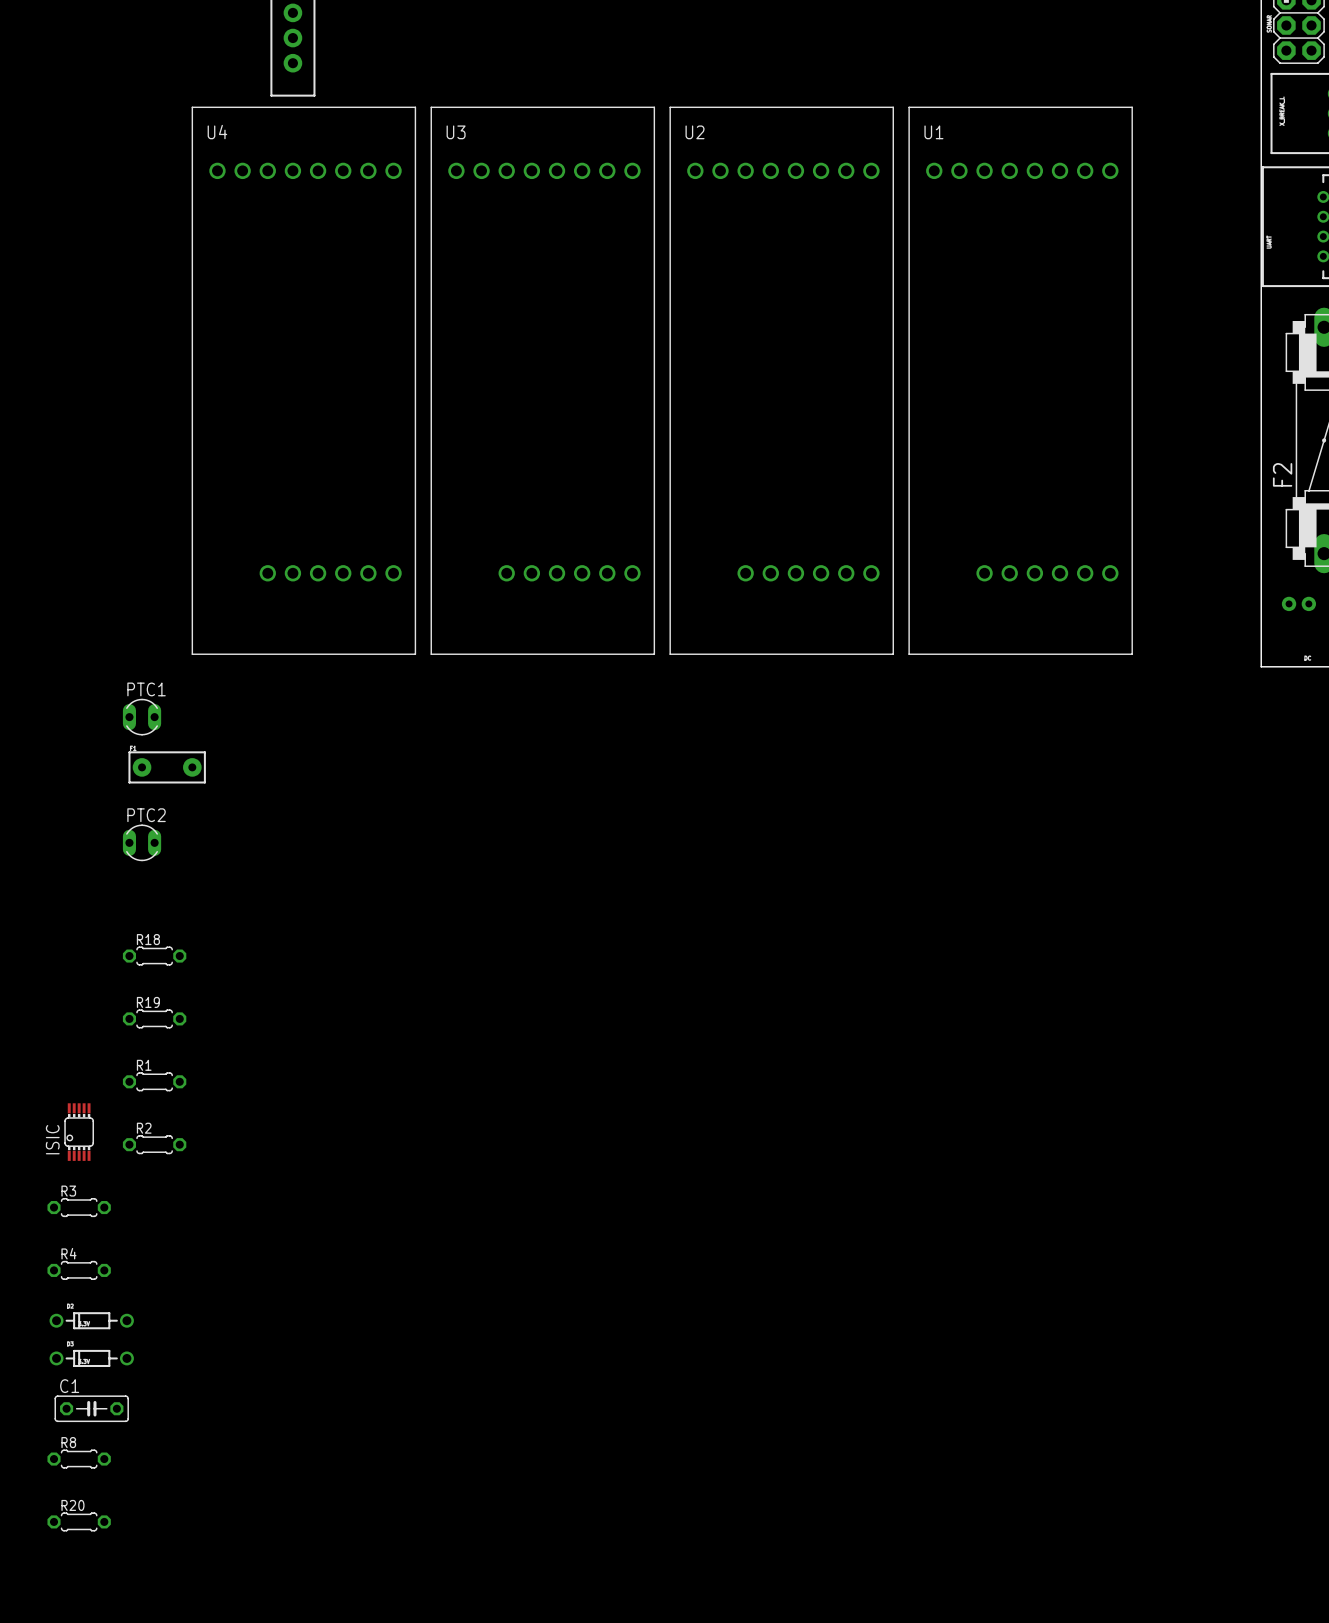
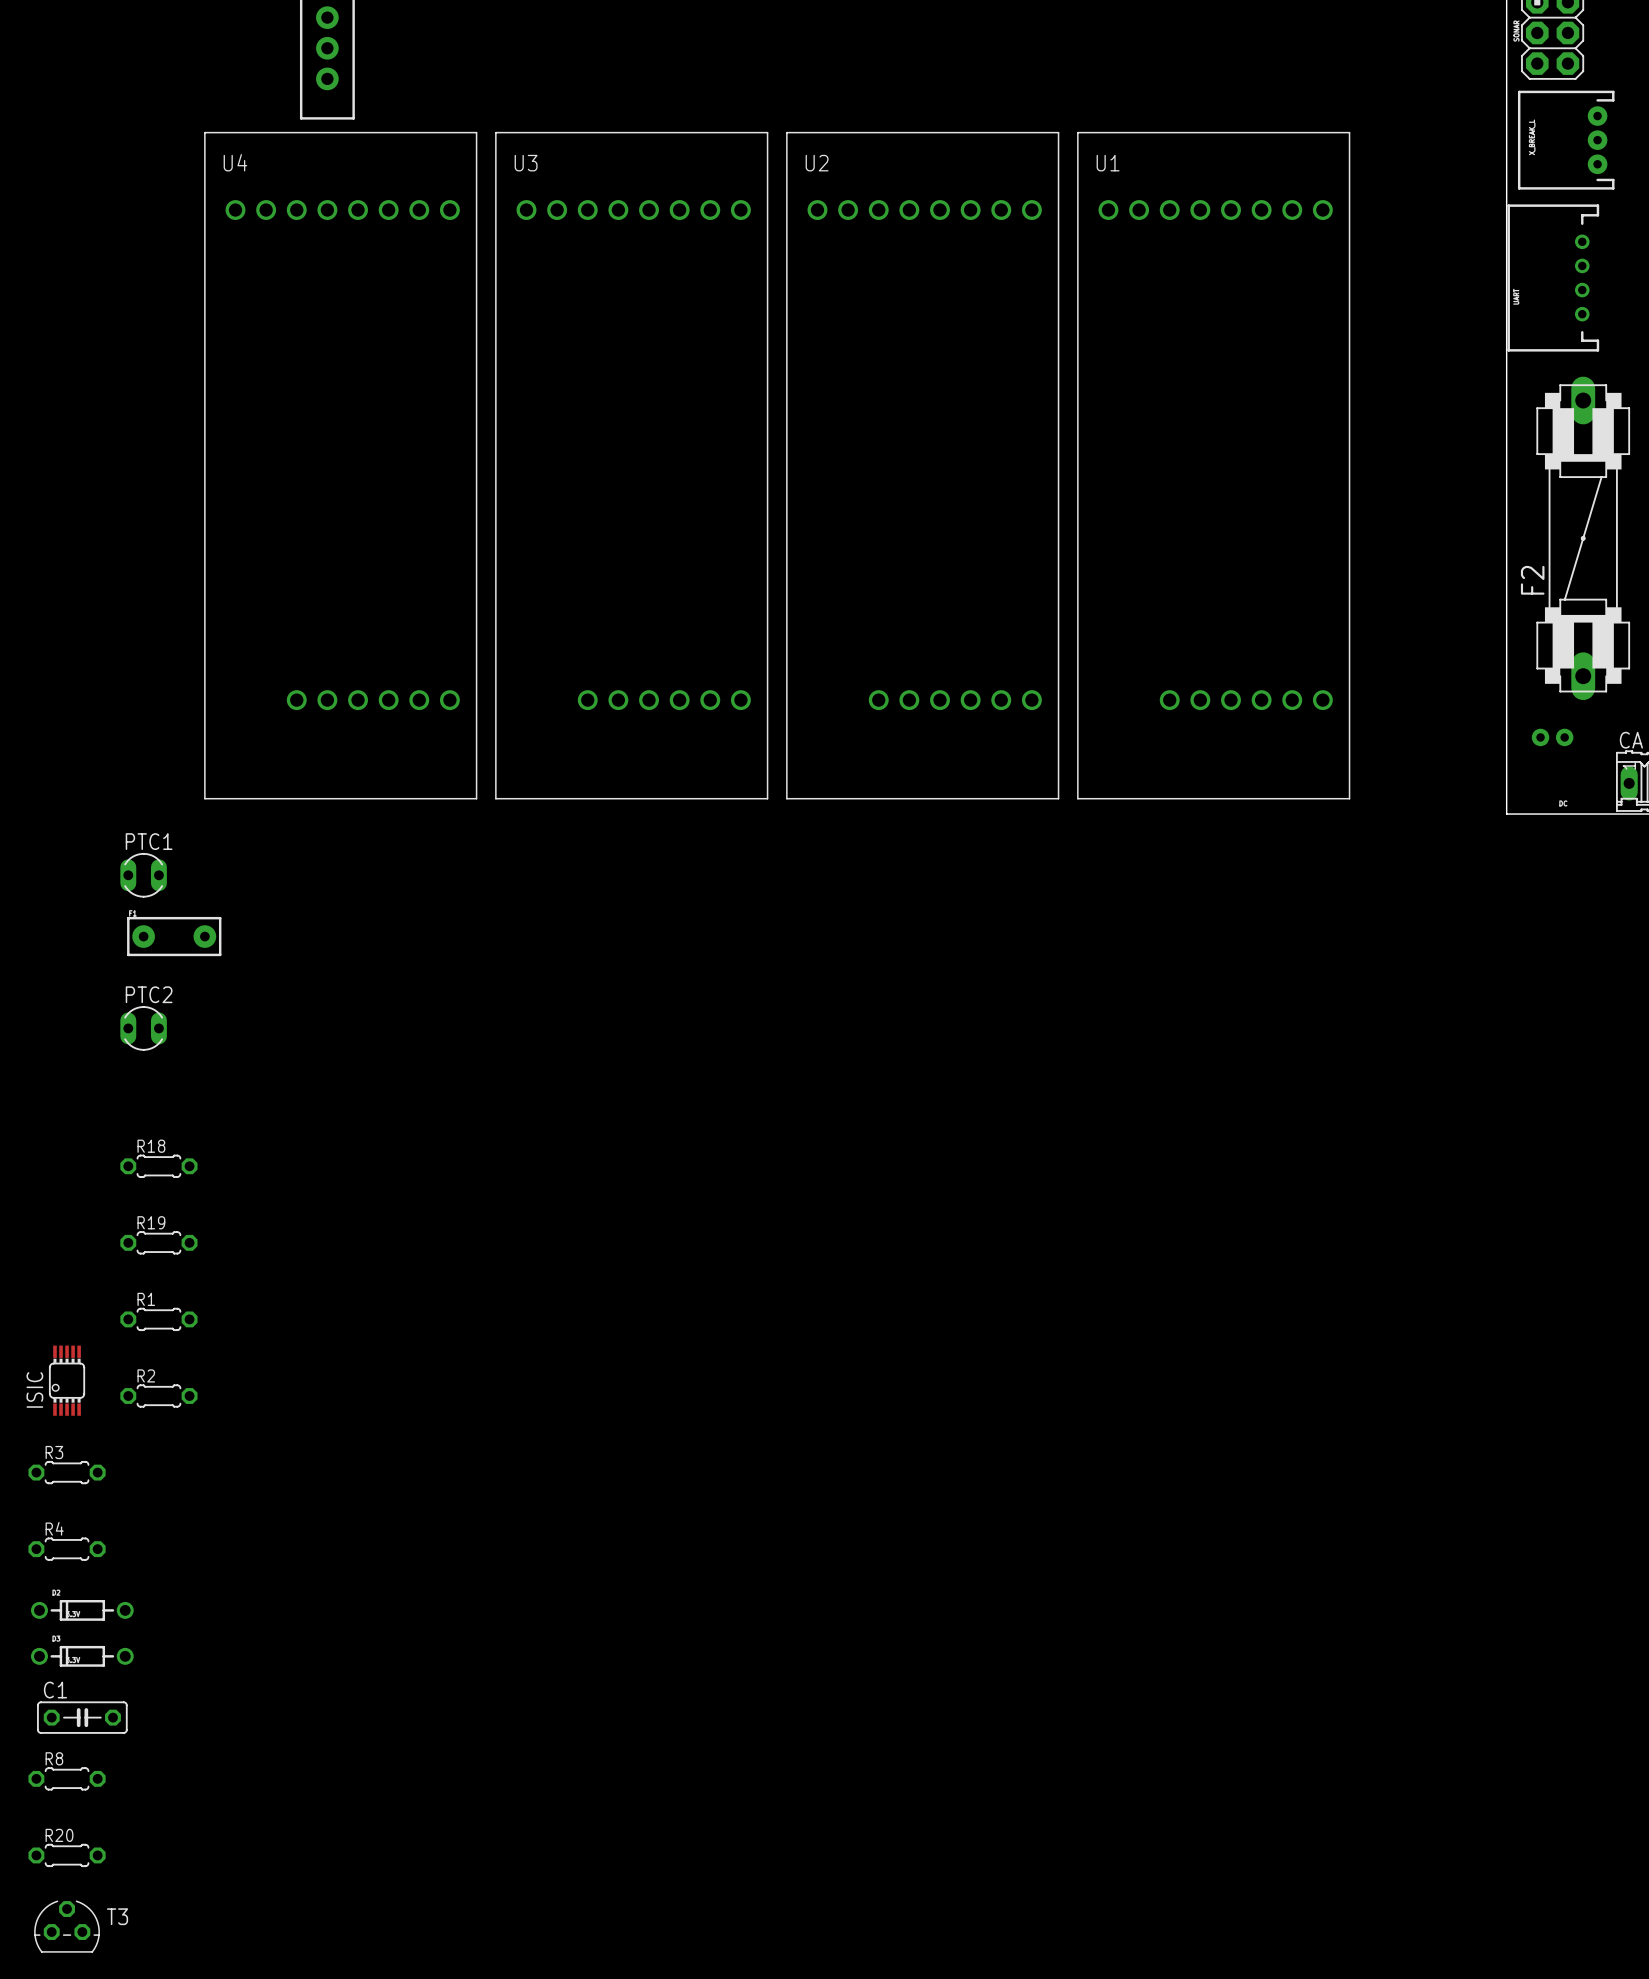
T3: none -> (67, 1926)

